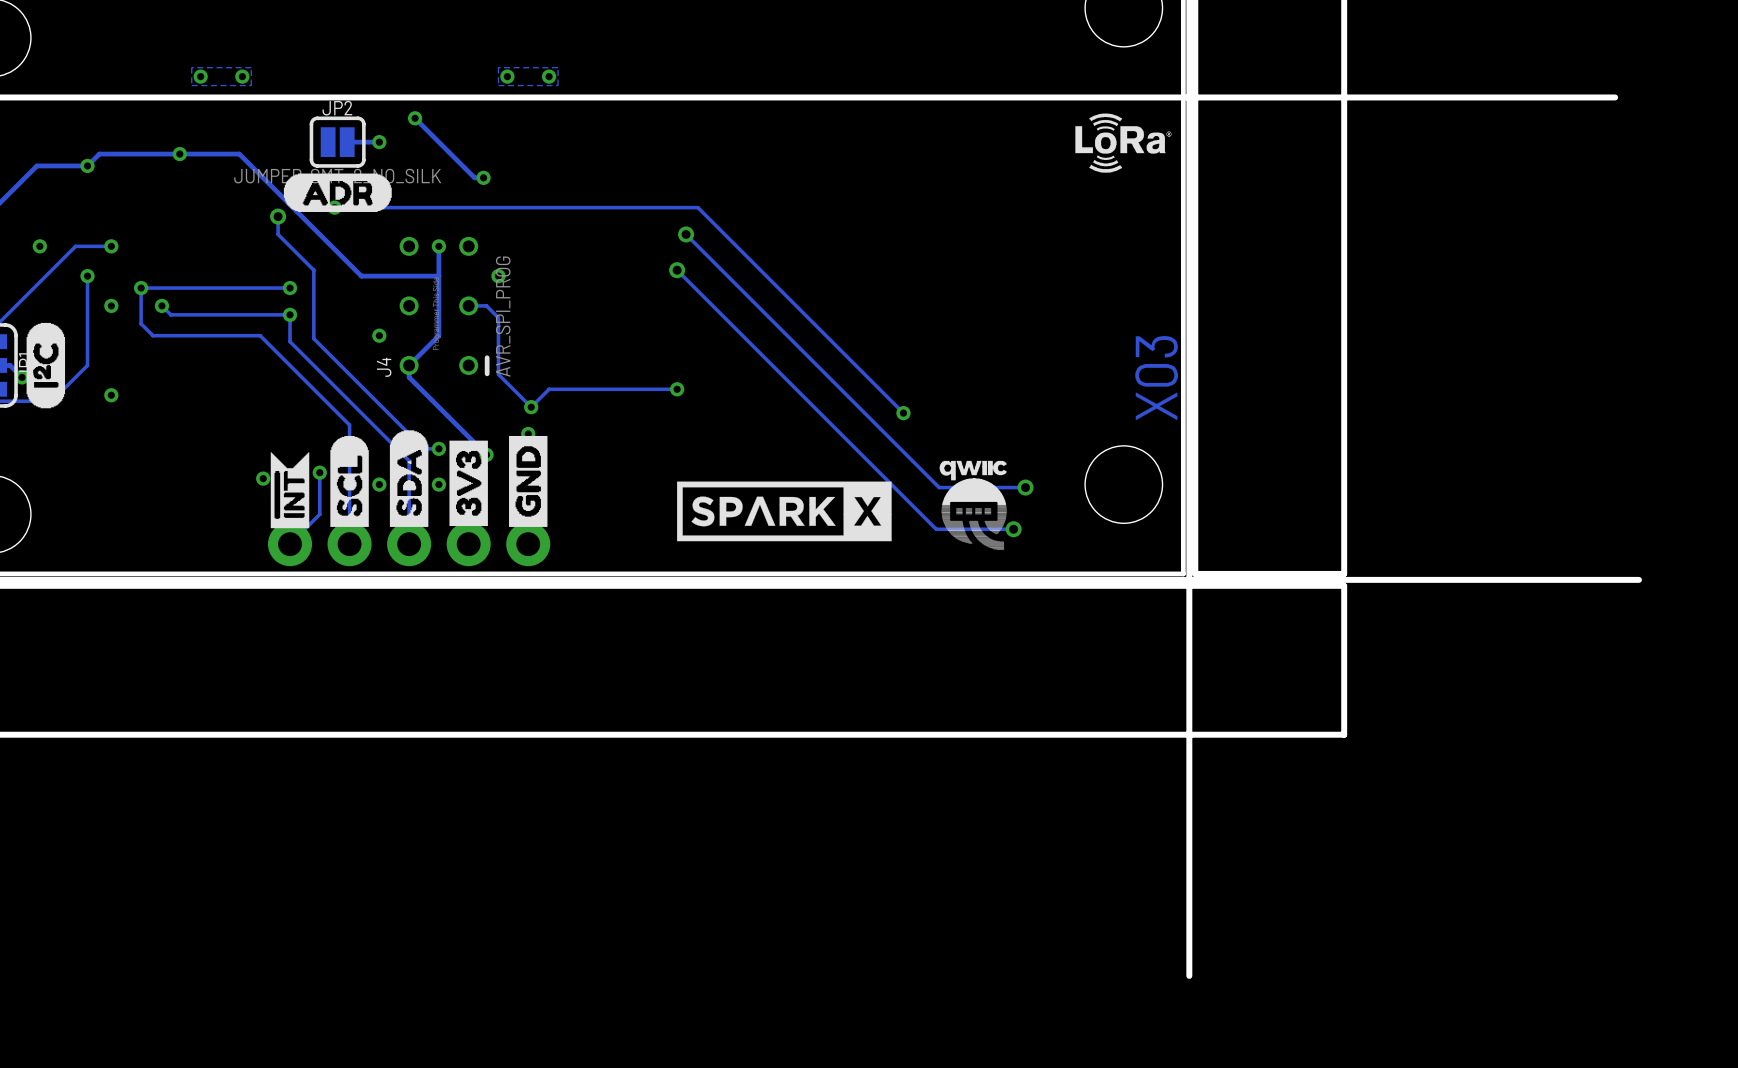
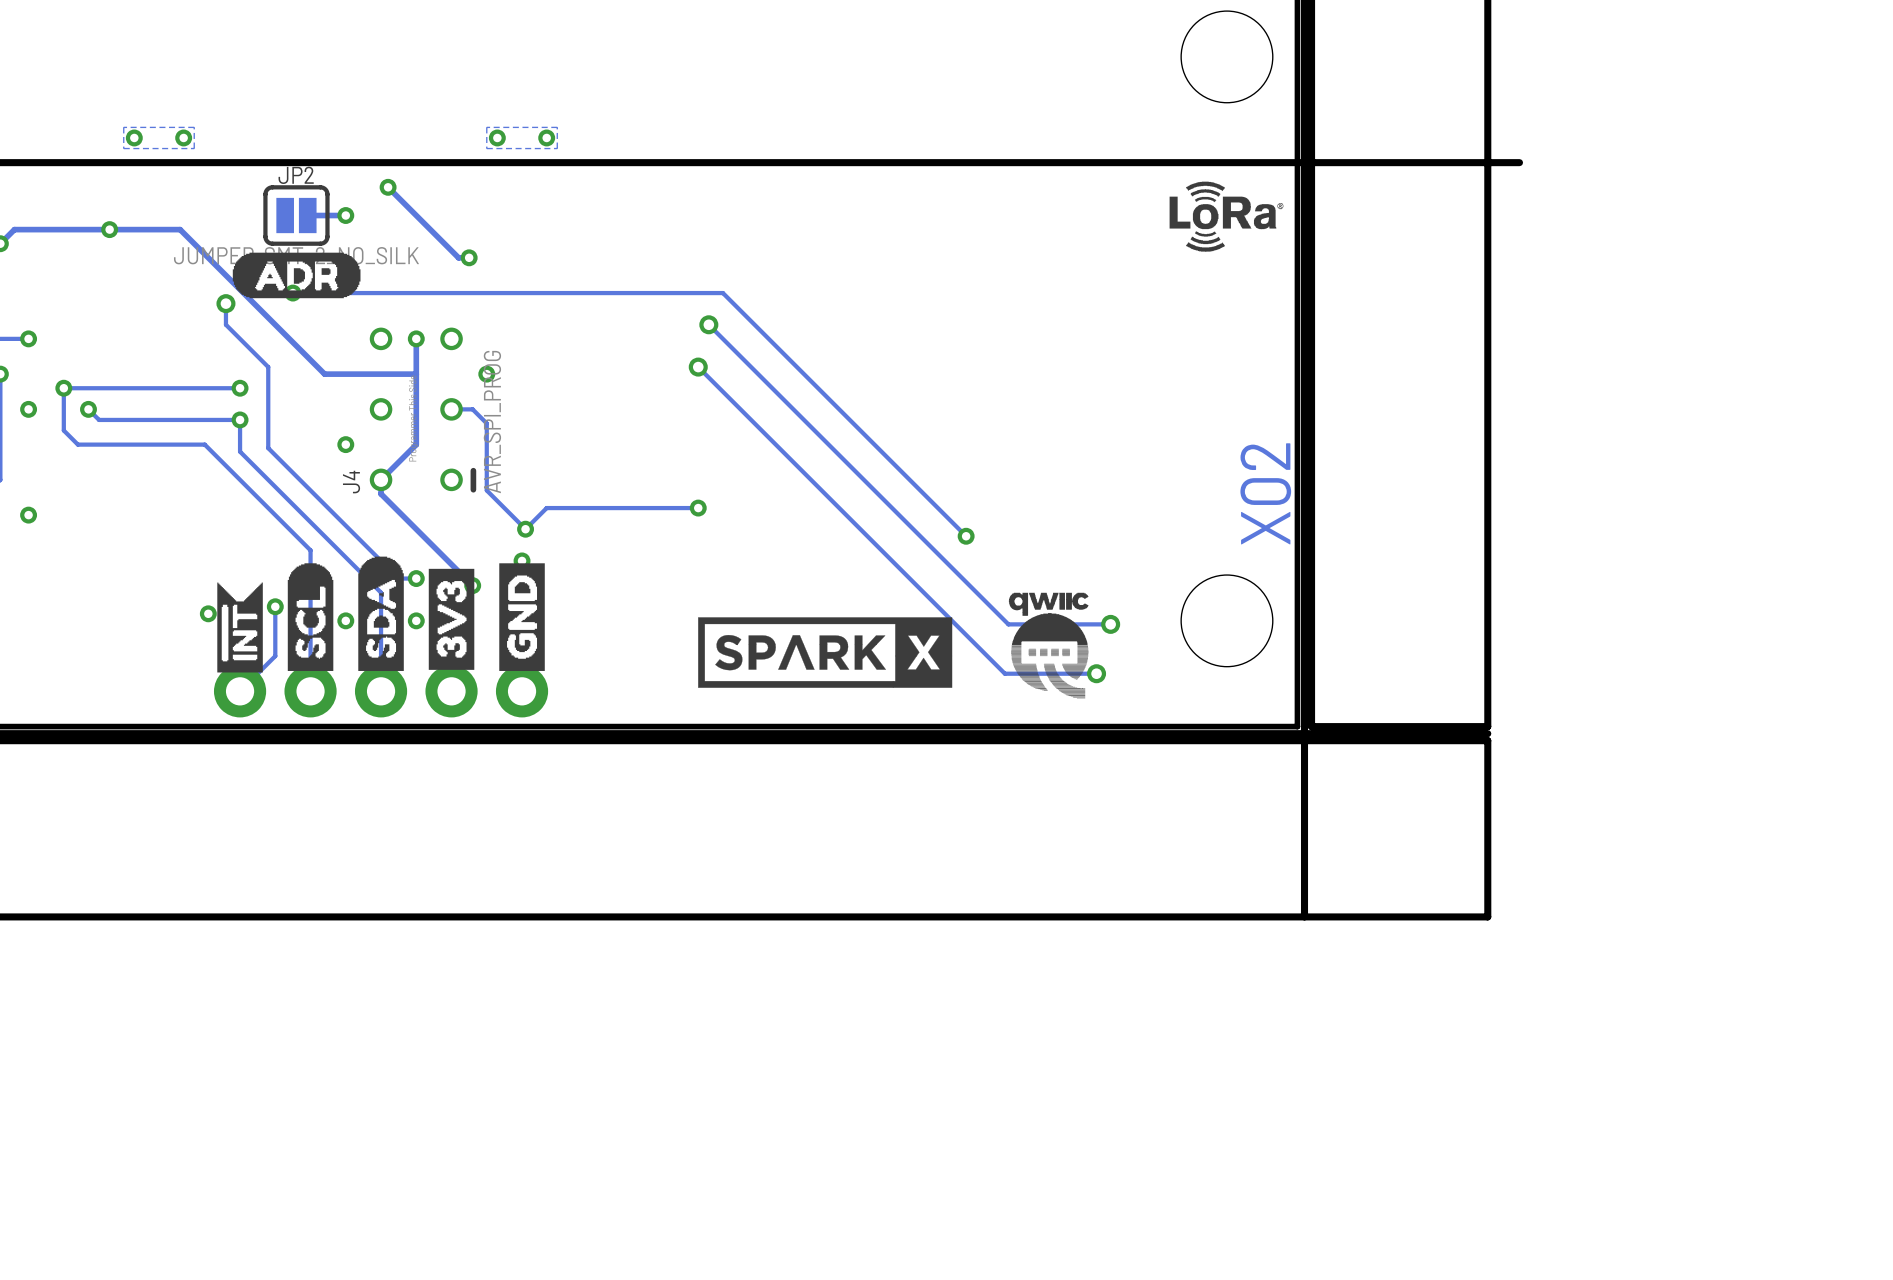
board edge: (1615, 97) (1370, 97) -> none
text: X03 (1156, 378) -> X02 (1265, 493)
board edge: (1638, 579) (1344, 579) -> none
board edge: (1189, 734) (1189, 975) -> none

